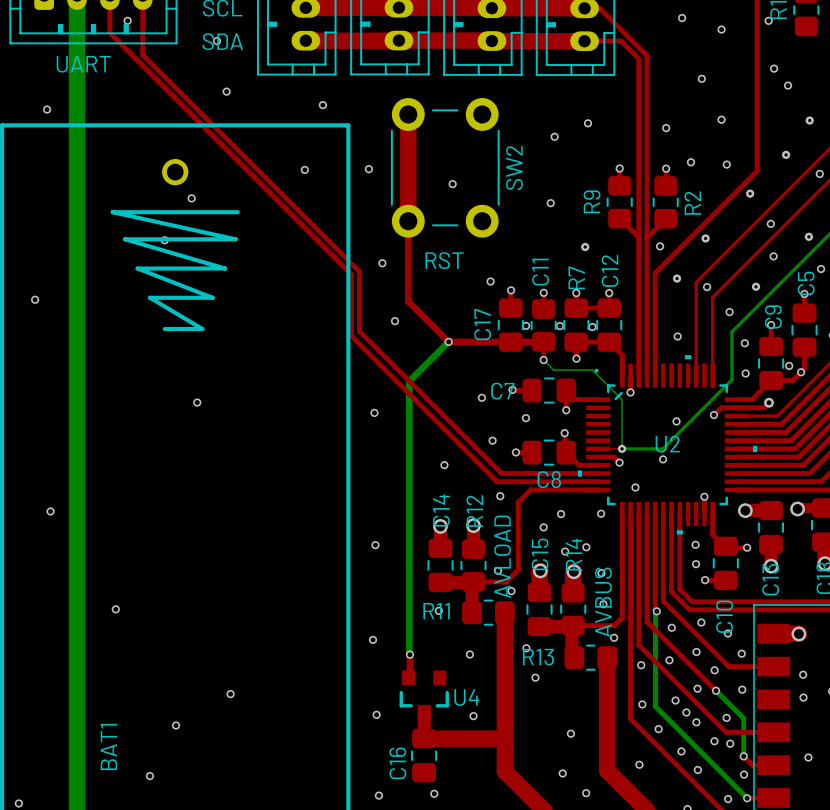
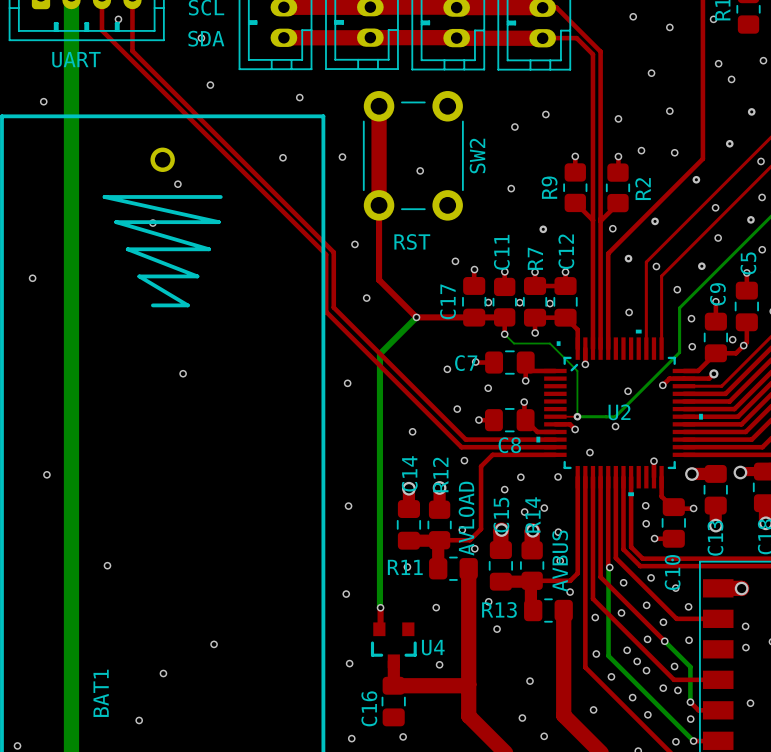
via: none -> (763, 60)
via: none -> (762, 197)

